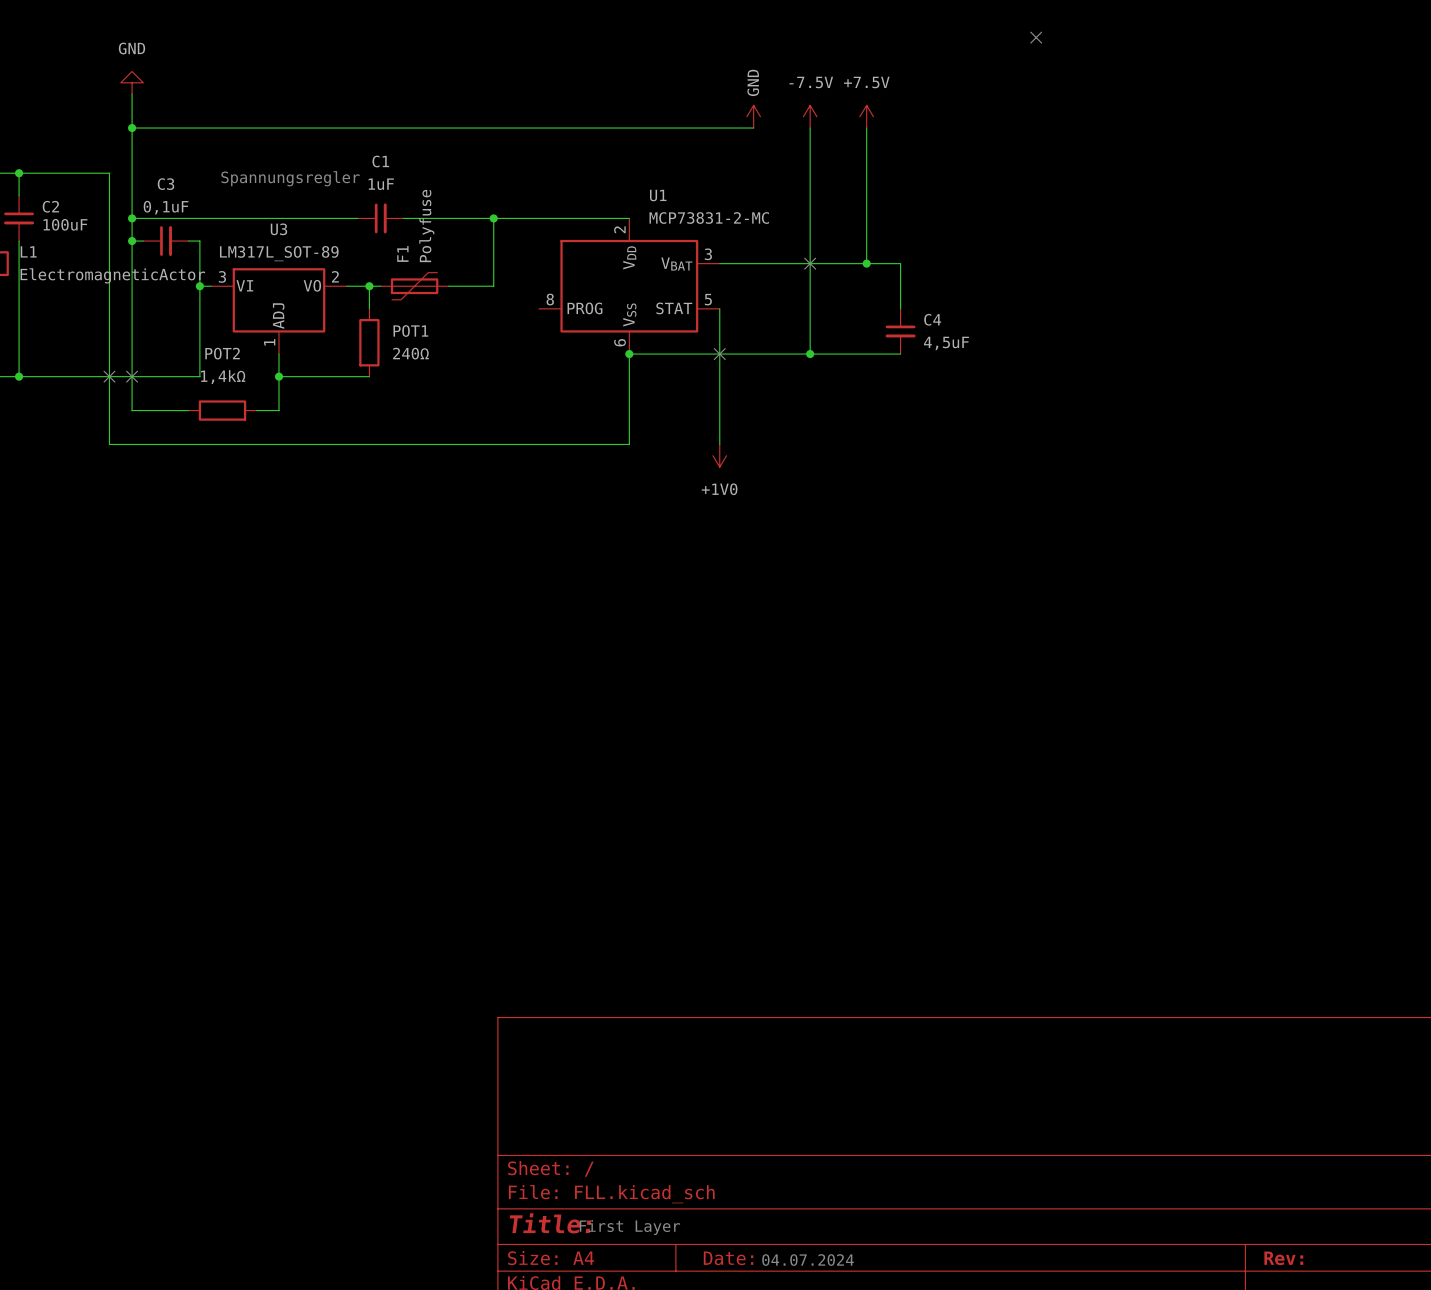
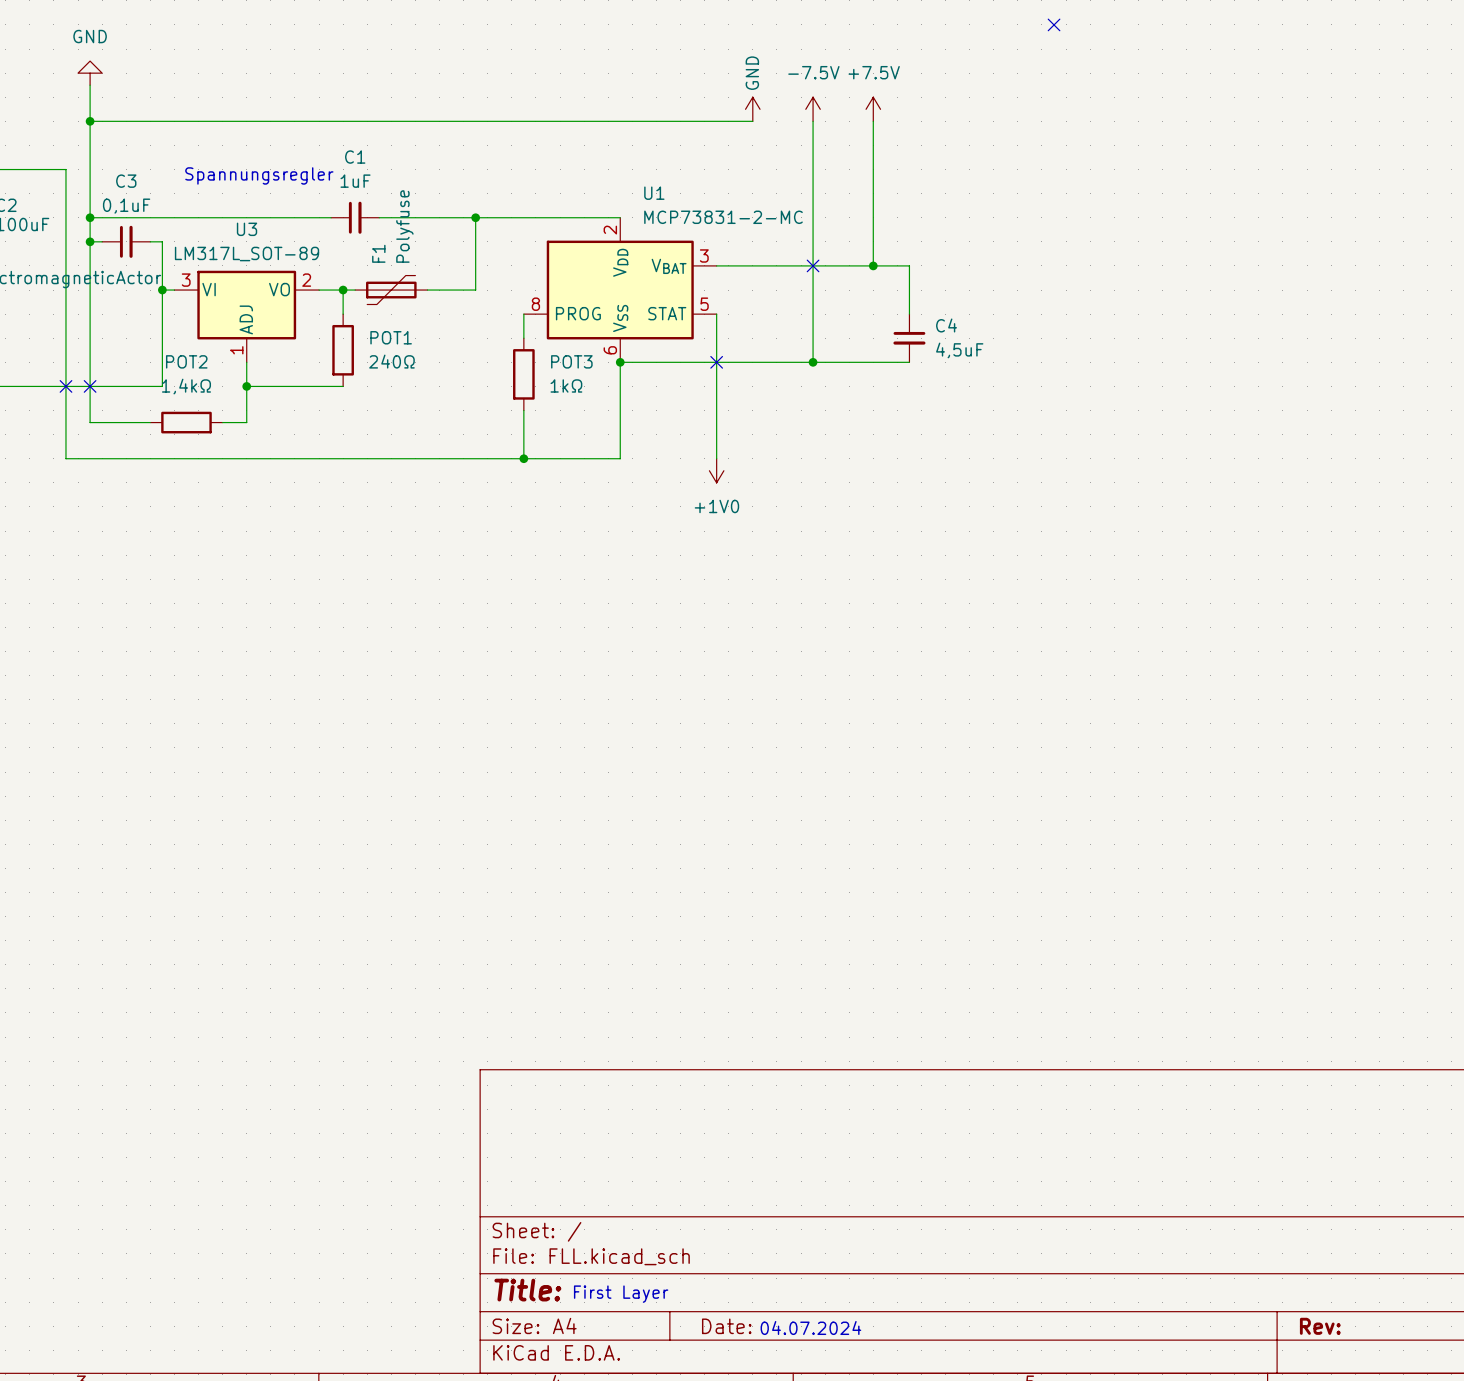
wire: none -> (523, 314) (523, 338)
POT3: none -> 1kΩ (523, 374)
wire: none -> (523, 410) (523, 458)
junction: none -> (523, 458)

